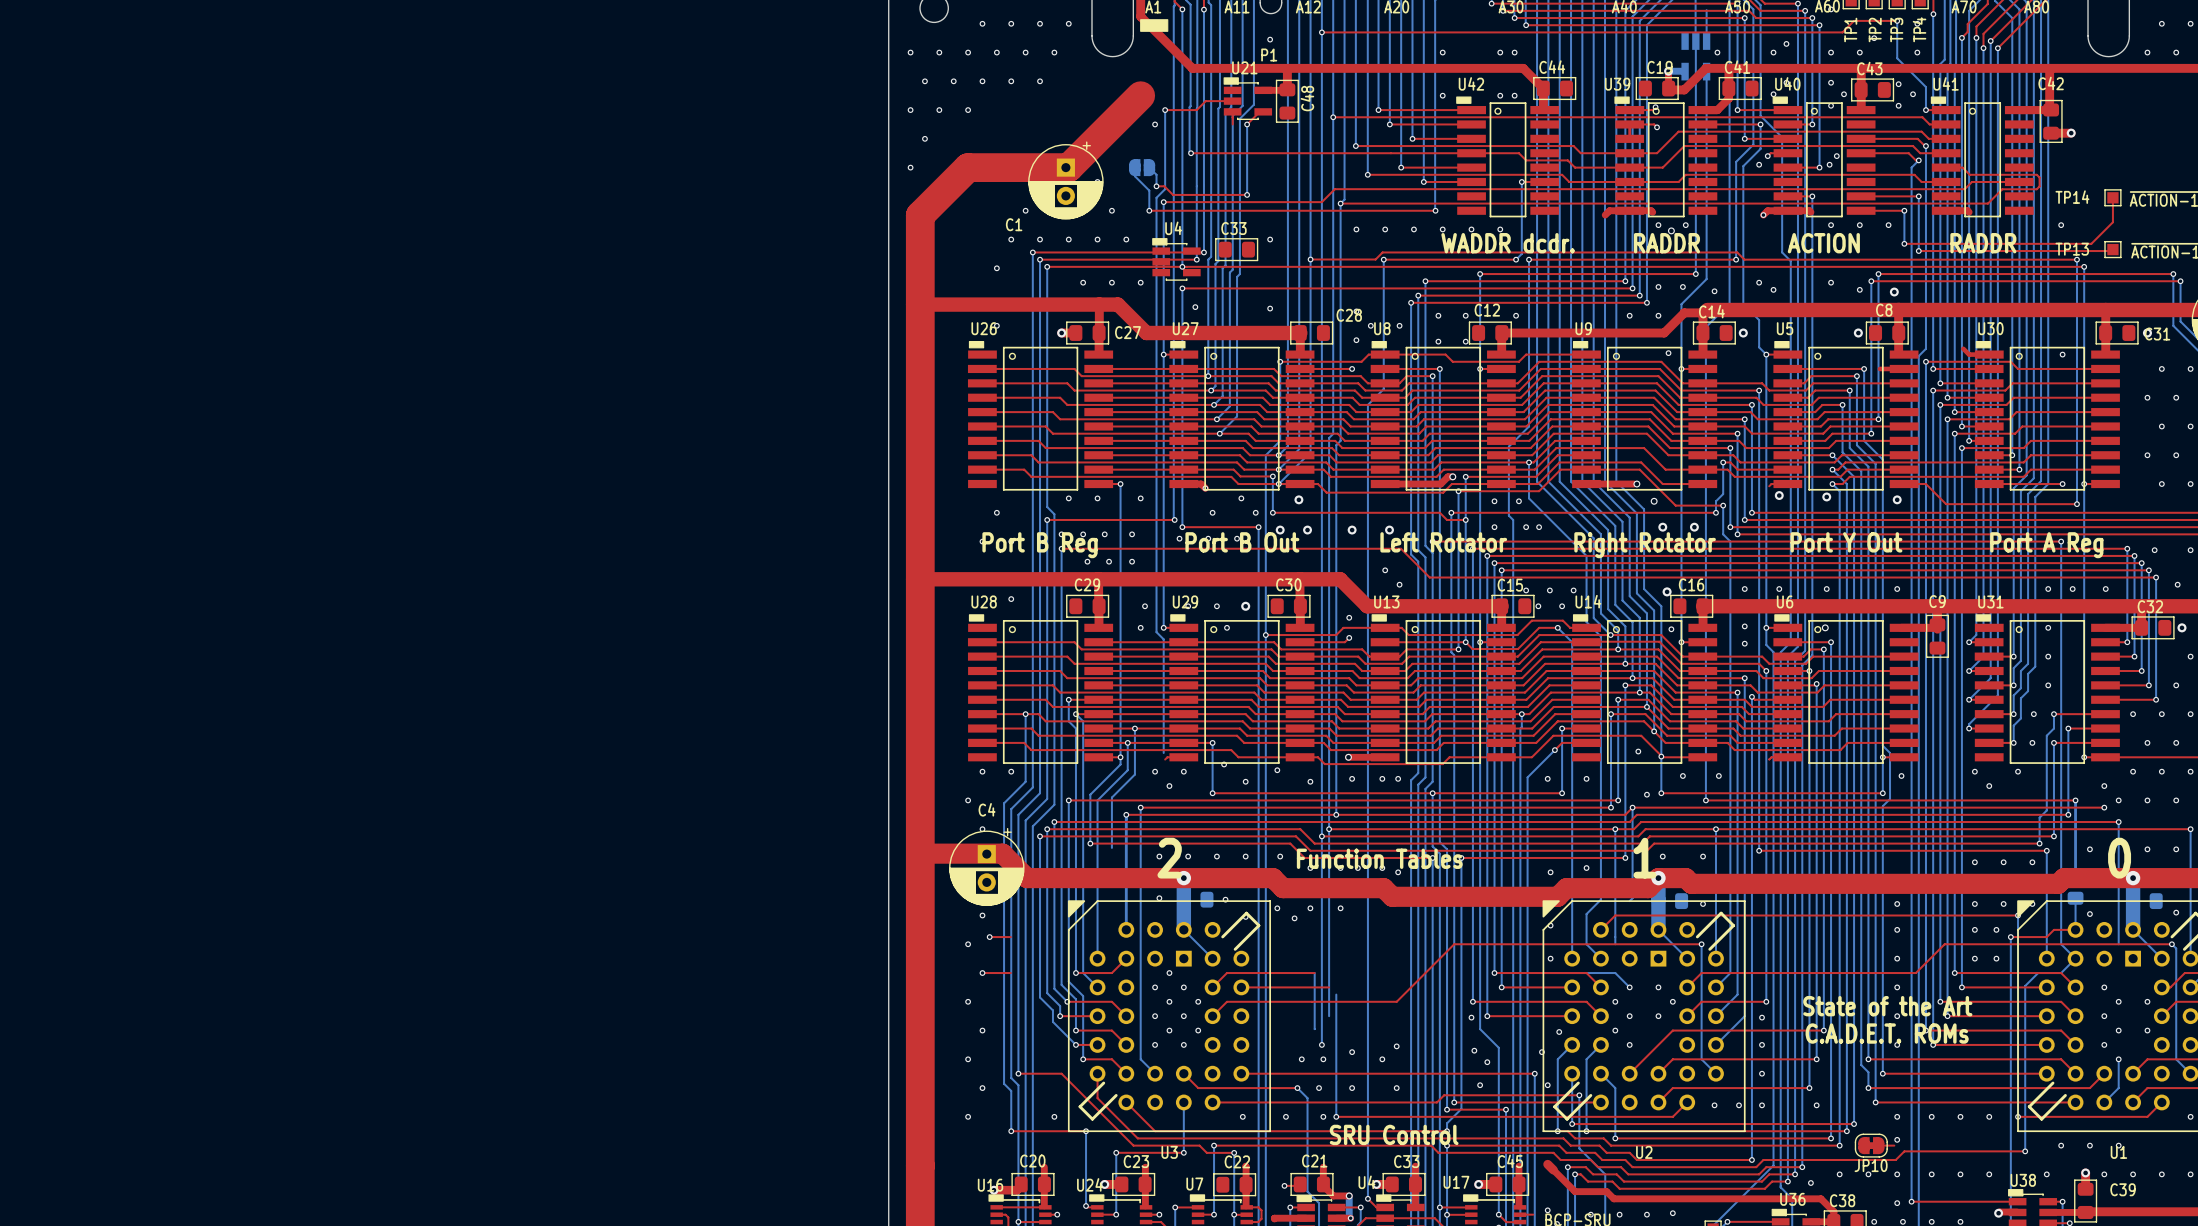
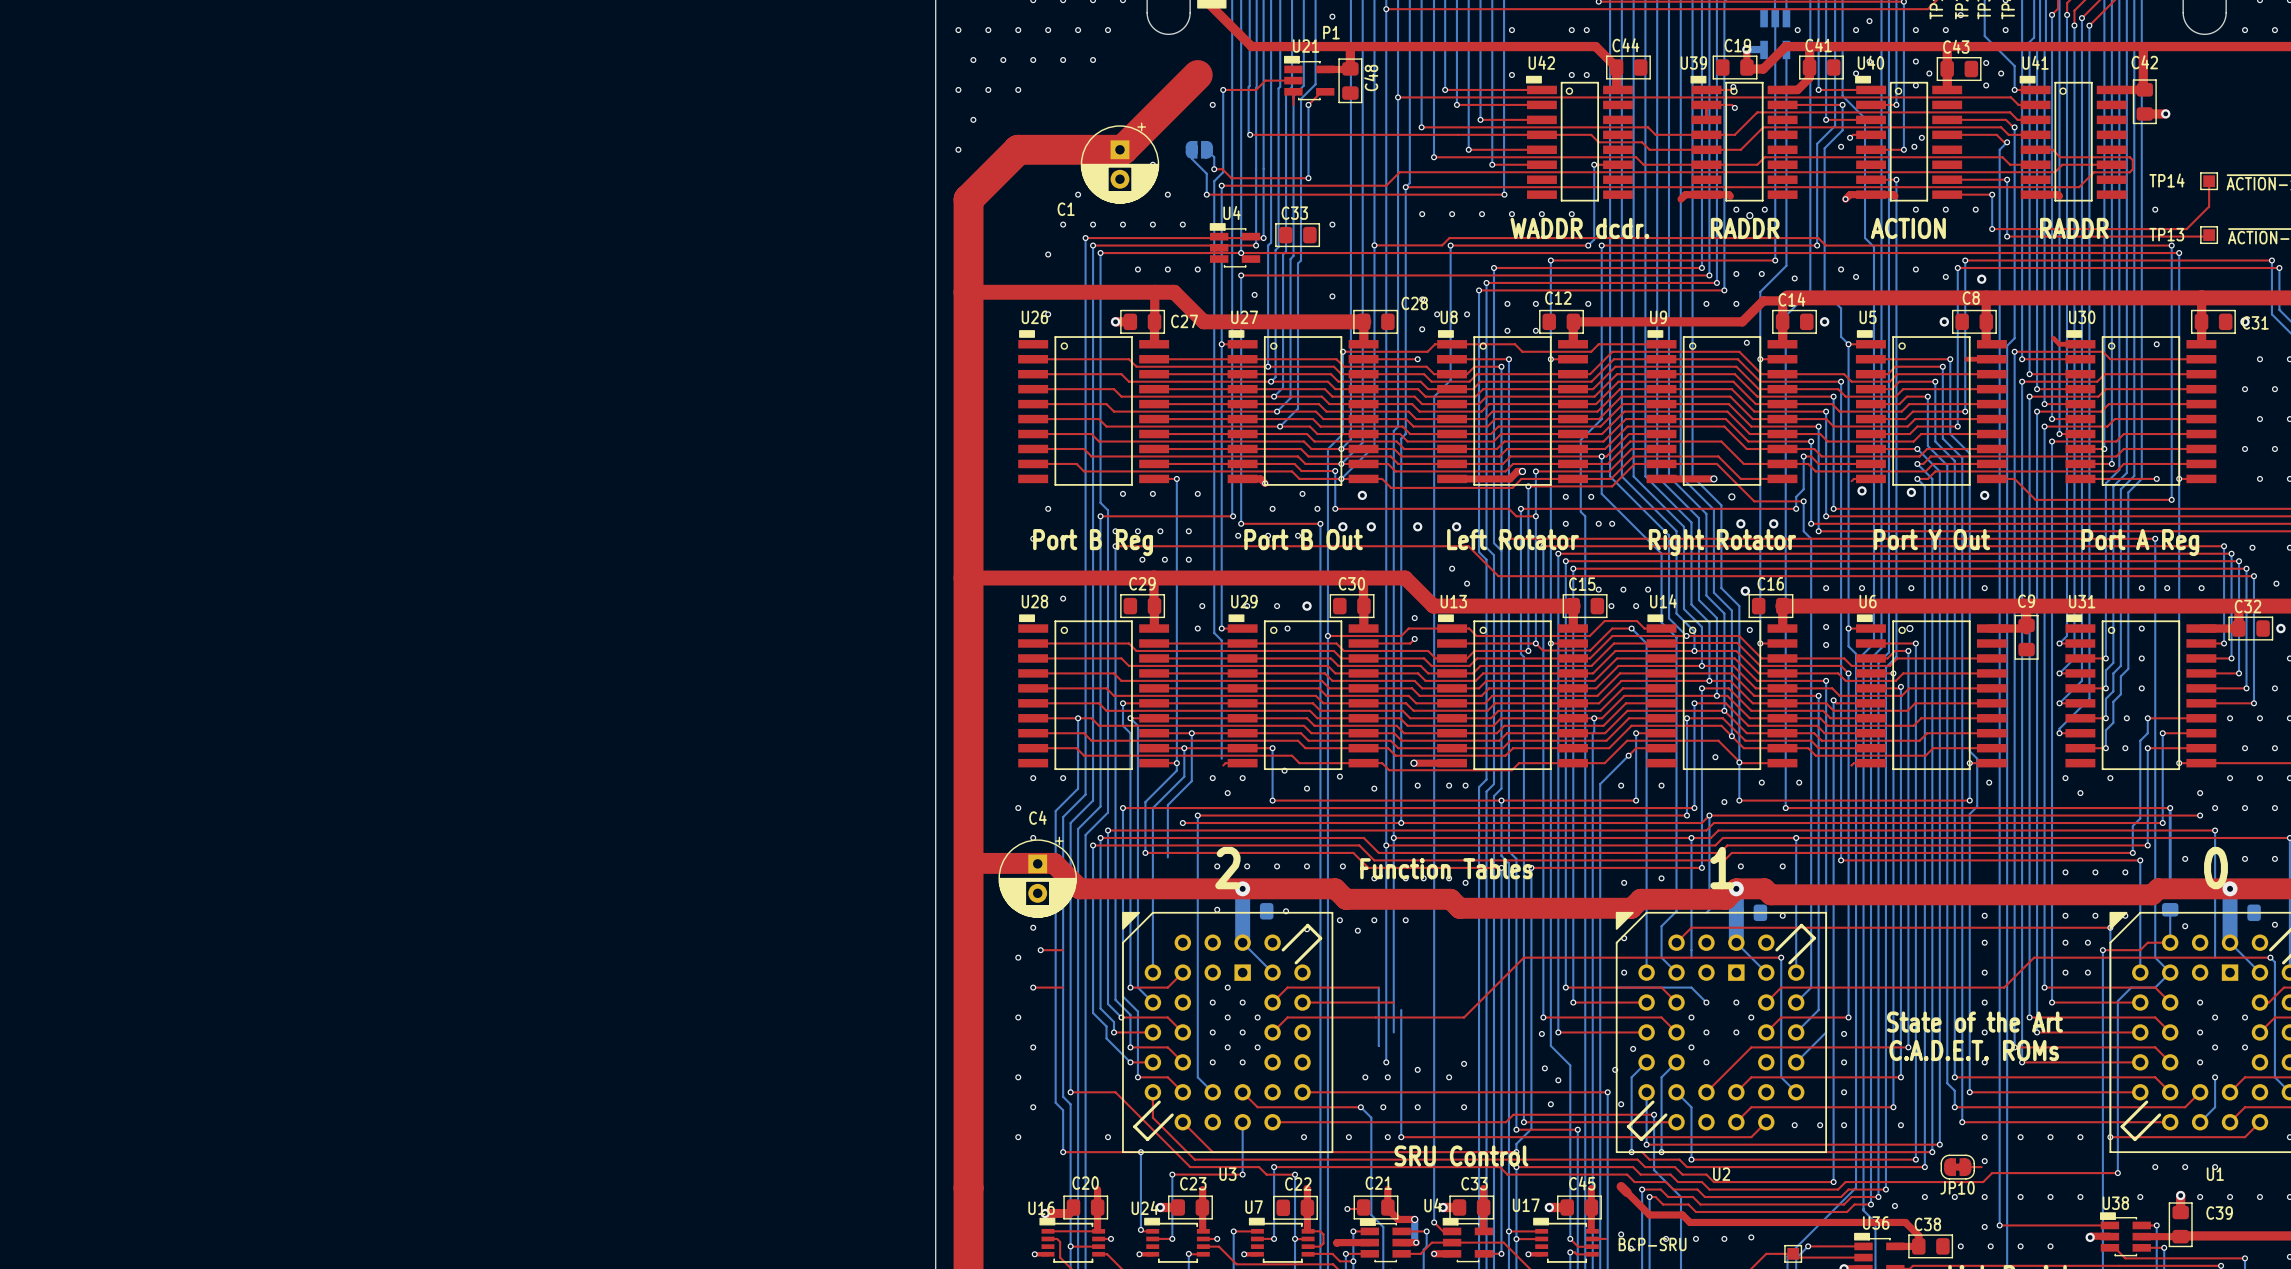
bottom track: (1126, 814) (1126, 929) -> none

